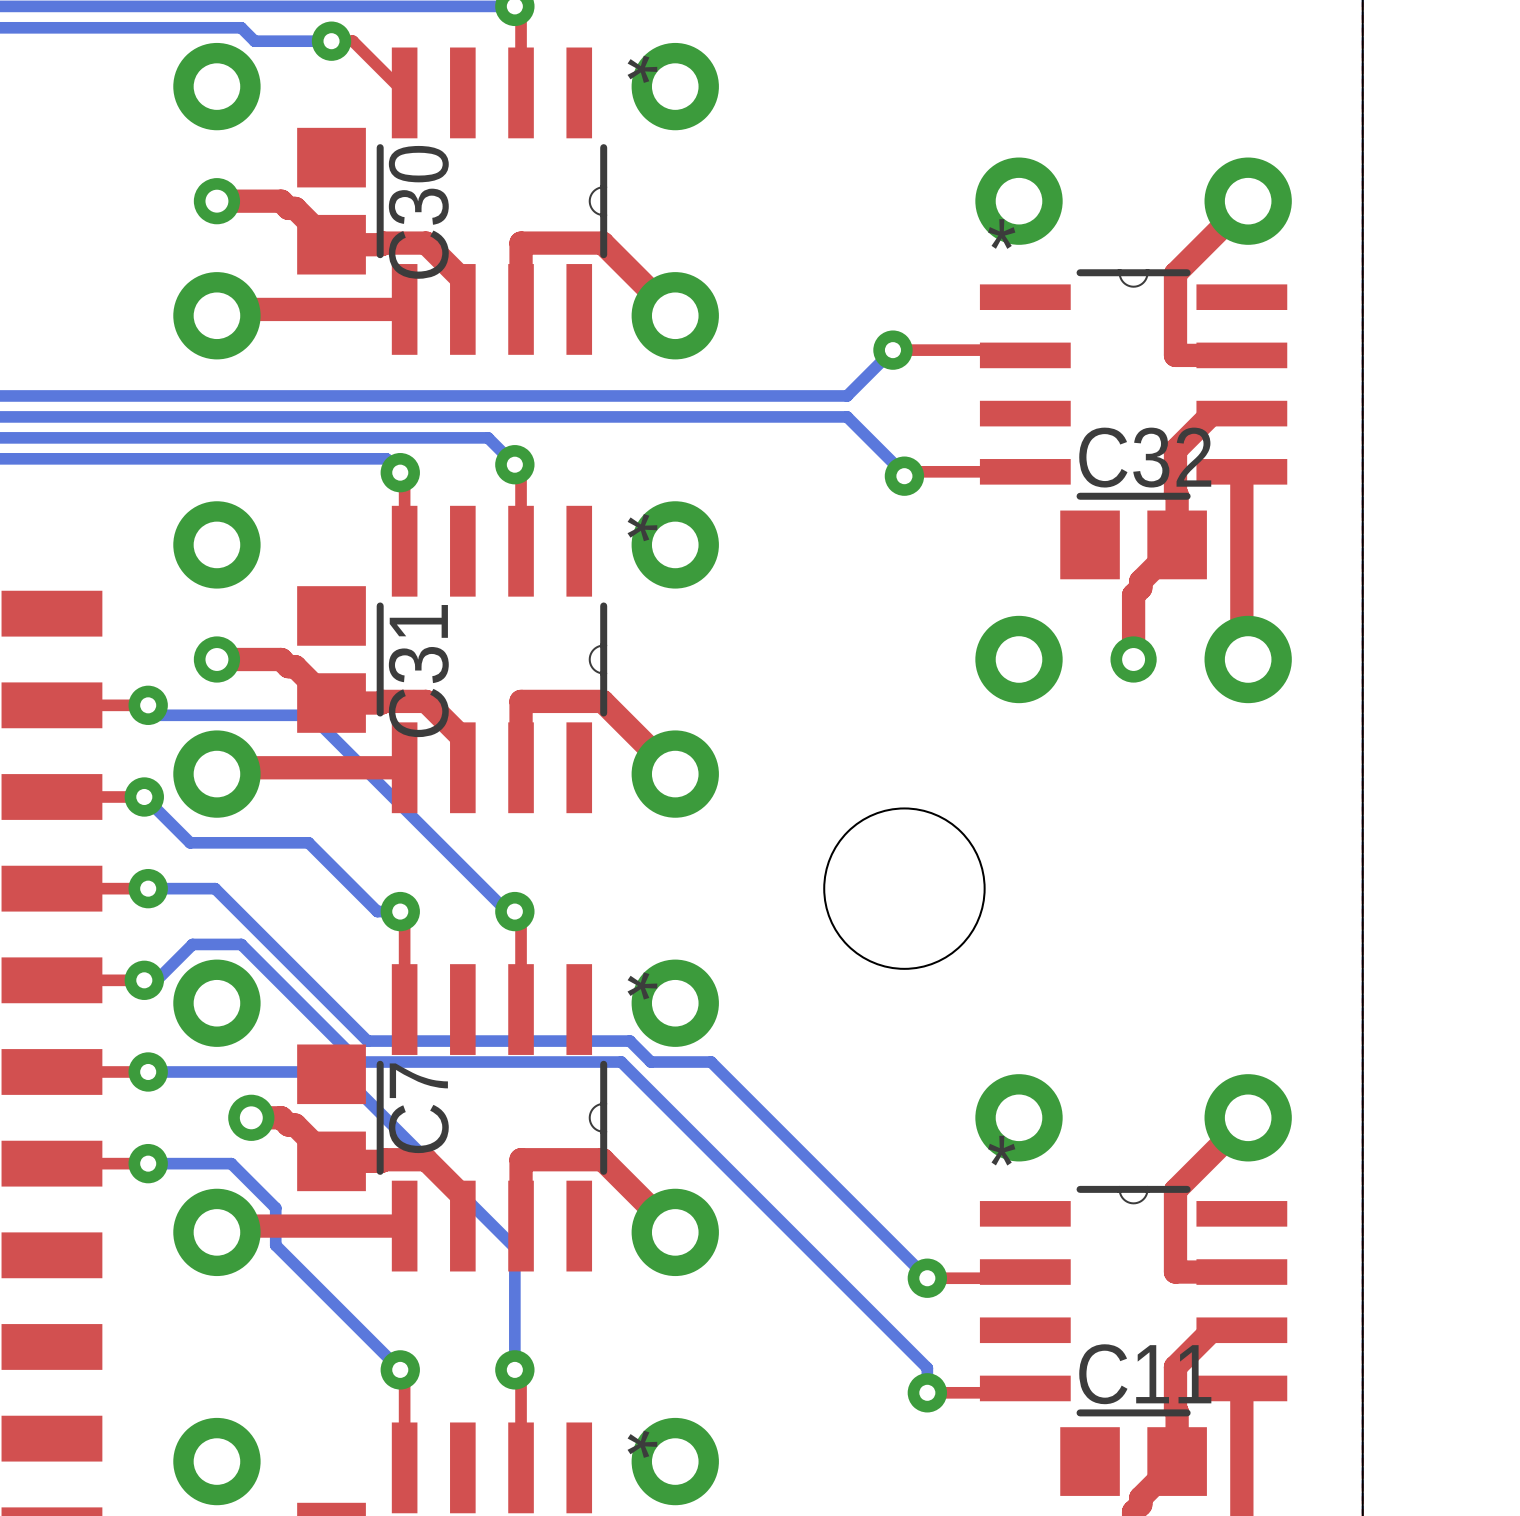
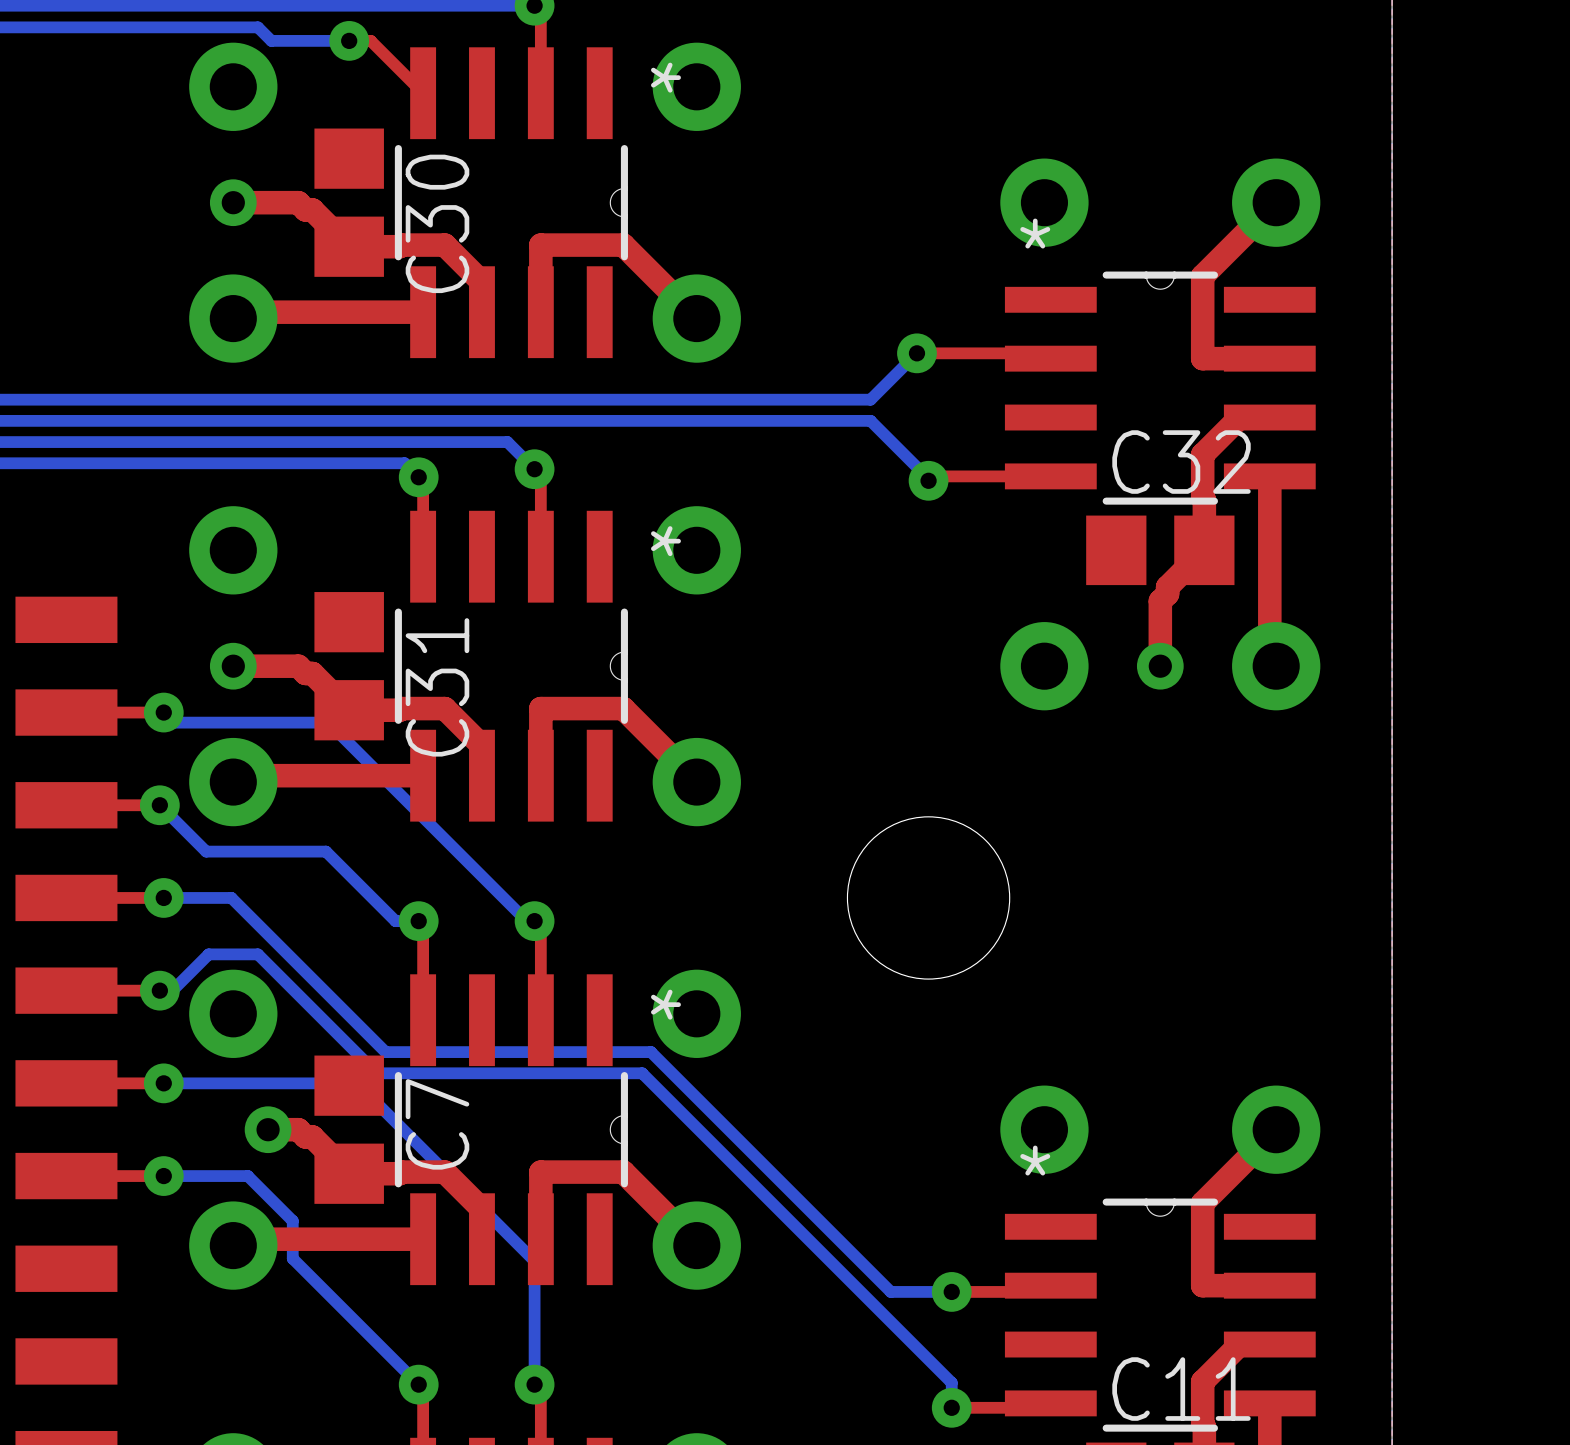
bottom track: (650, 1062) (711, 1062) (927, 1278) -> (672, 1073) (890, 1291) (951, 1291)

